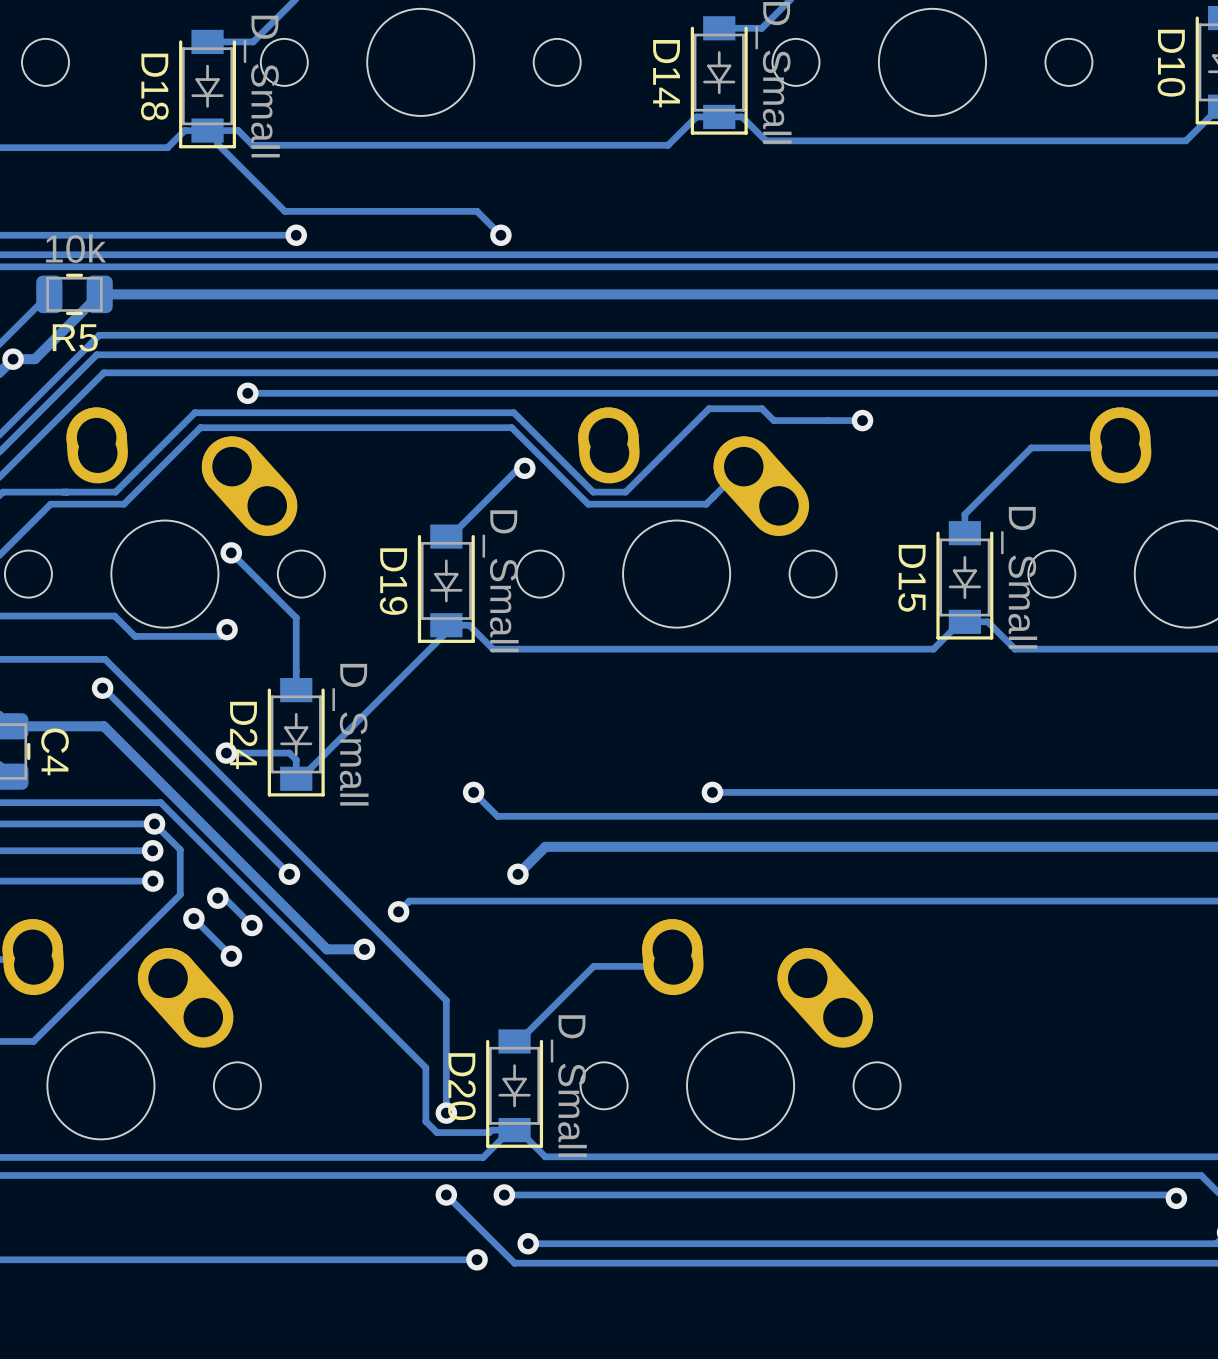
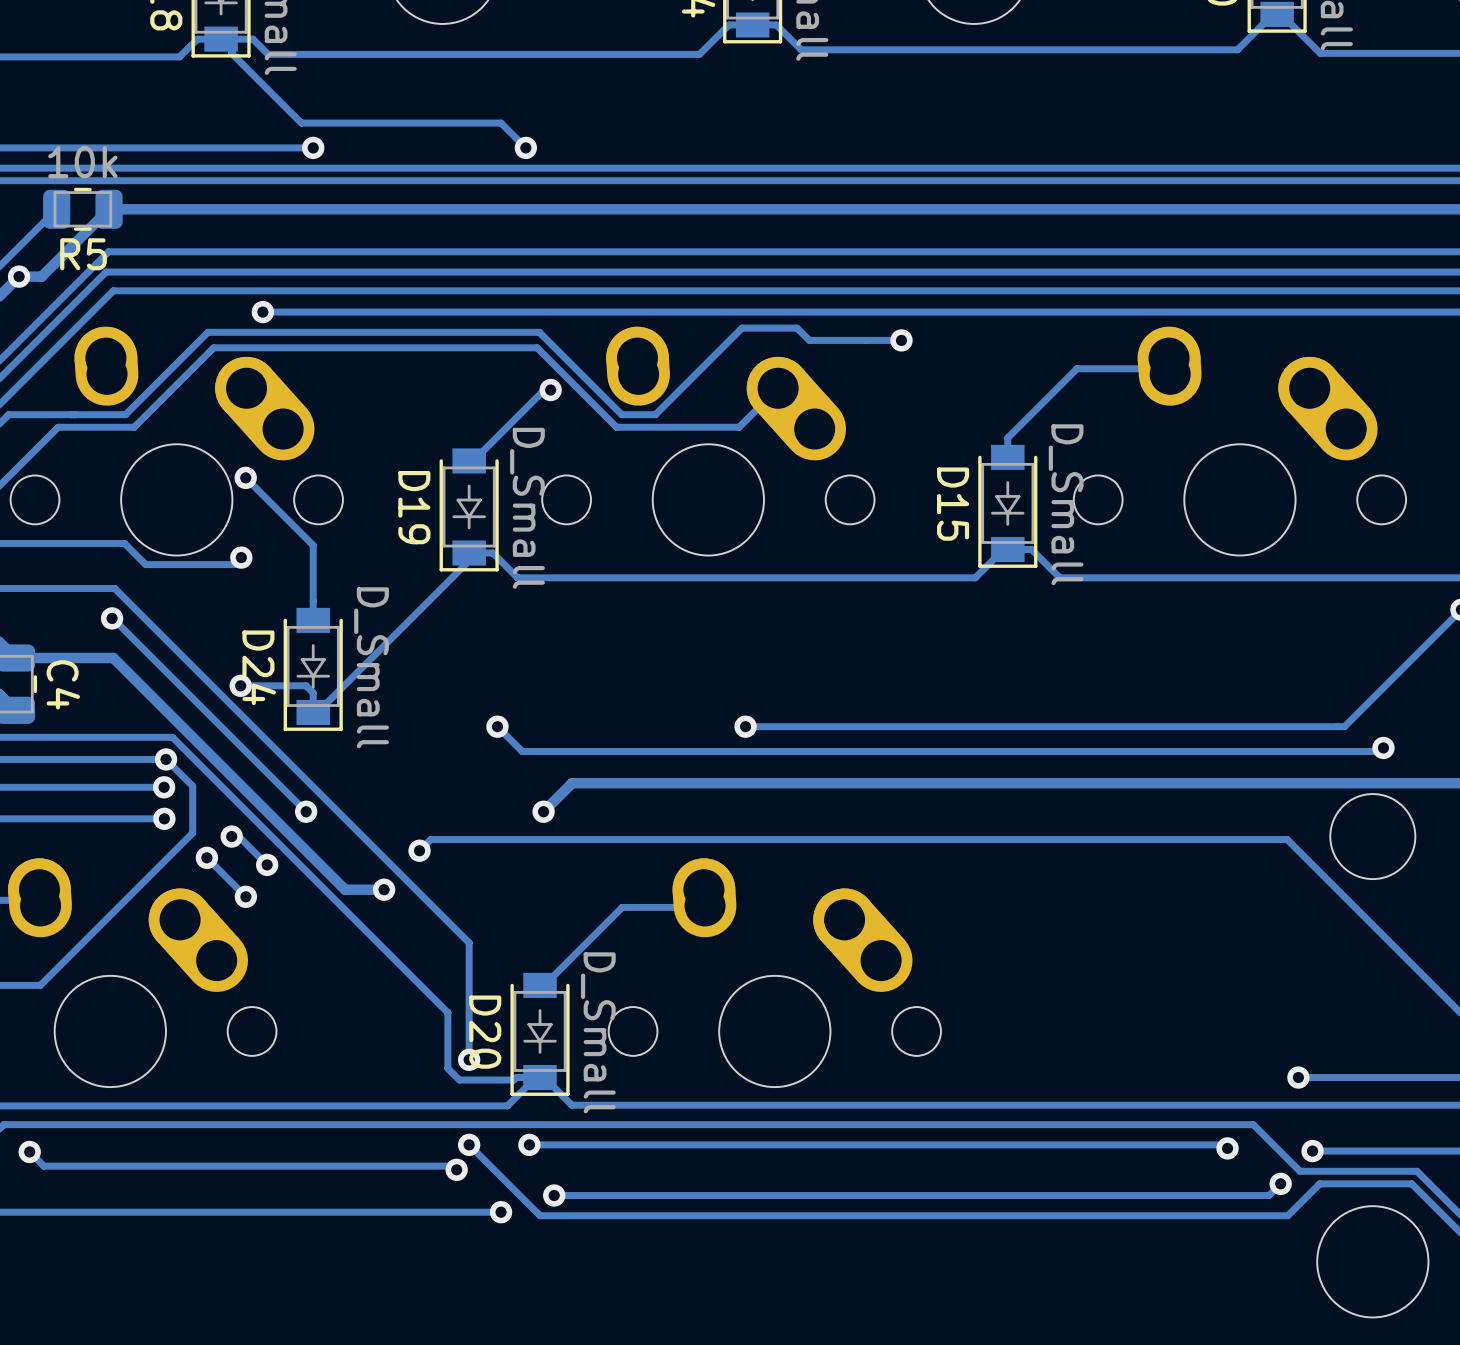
track: none -> (29, 1151) (43, 1166) (452, 1166) (456, 1169)
via: none -> (29, 1151)
via: none -> (456, 1169)

